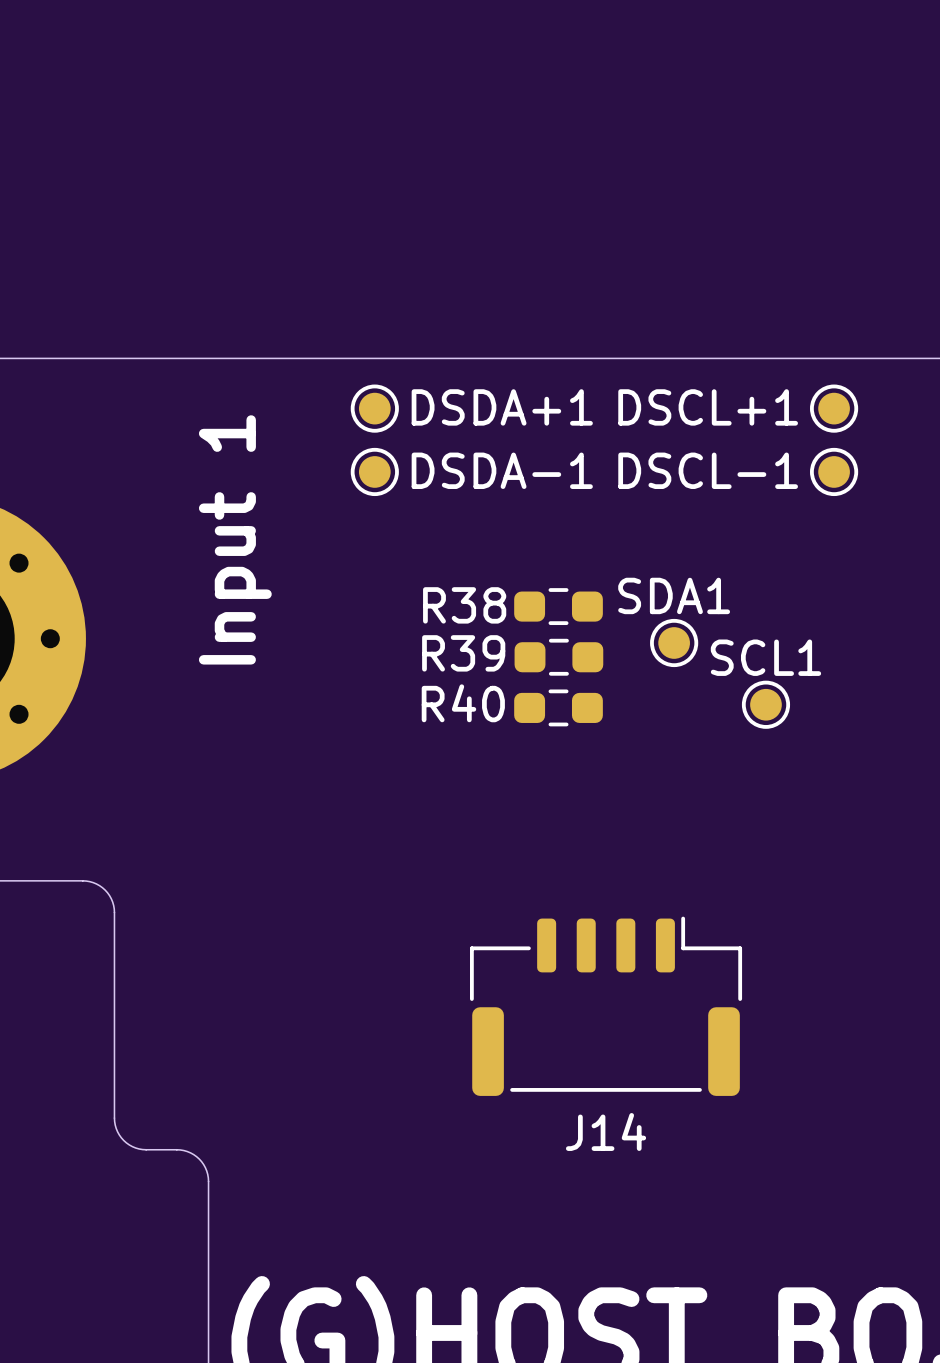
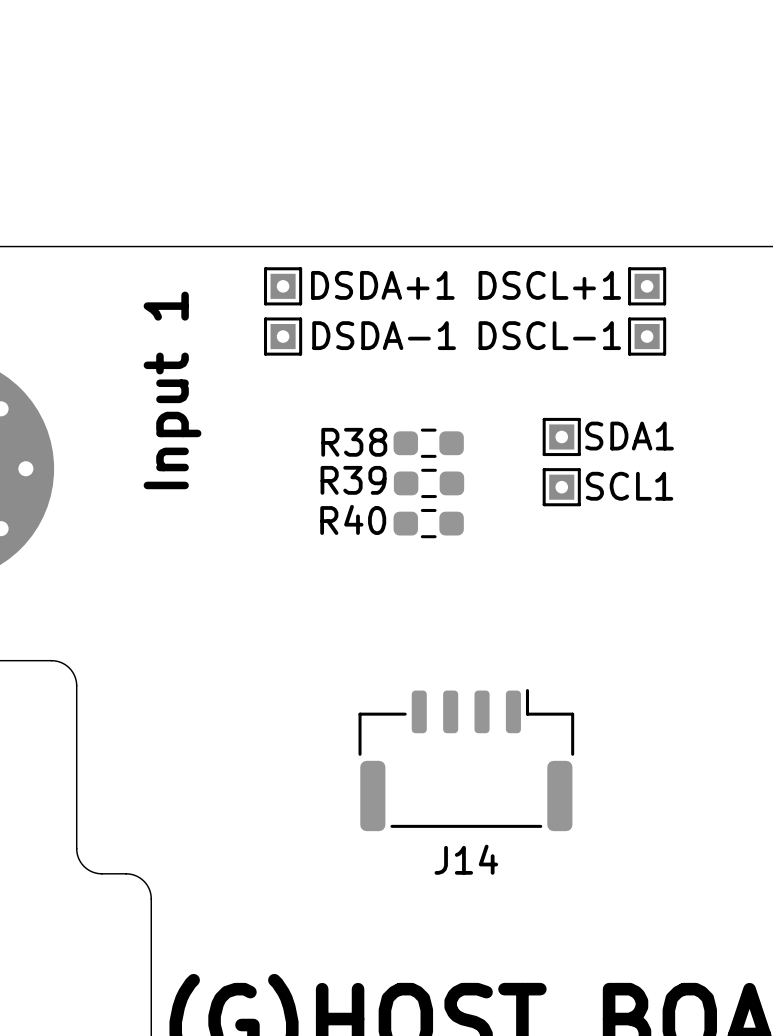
DSDA+1 footprint: [350, 384, 399, 433] -> [263, 267, 303, 306]
DSCL+1 footprint: [810, 384, 859, 433] -> [628, 267, 667, 306]
DSDA-1 footprint: [350, 447, 399, 497] -> [263, 317, 303, 356]
DSCL-1 footprint: [810, 447, 859, 497] -> [628, 317, 667, 356]
SDA1 name position: SDA1 (674, 595) -> SDA1 (629, 436)
SDA1 footprint: [650, 618, 699, 668] -> [542, 417, 581, 457]
SCL1 name position: SCL1 (765, 657) -> SCL1 (629, 486)
SCL1 footprint: [741, 680, 791, 729] -> [542, 468, 581, 507]

